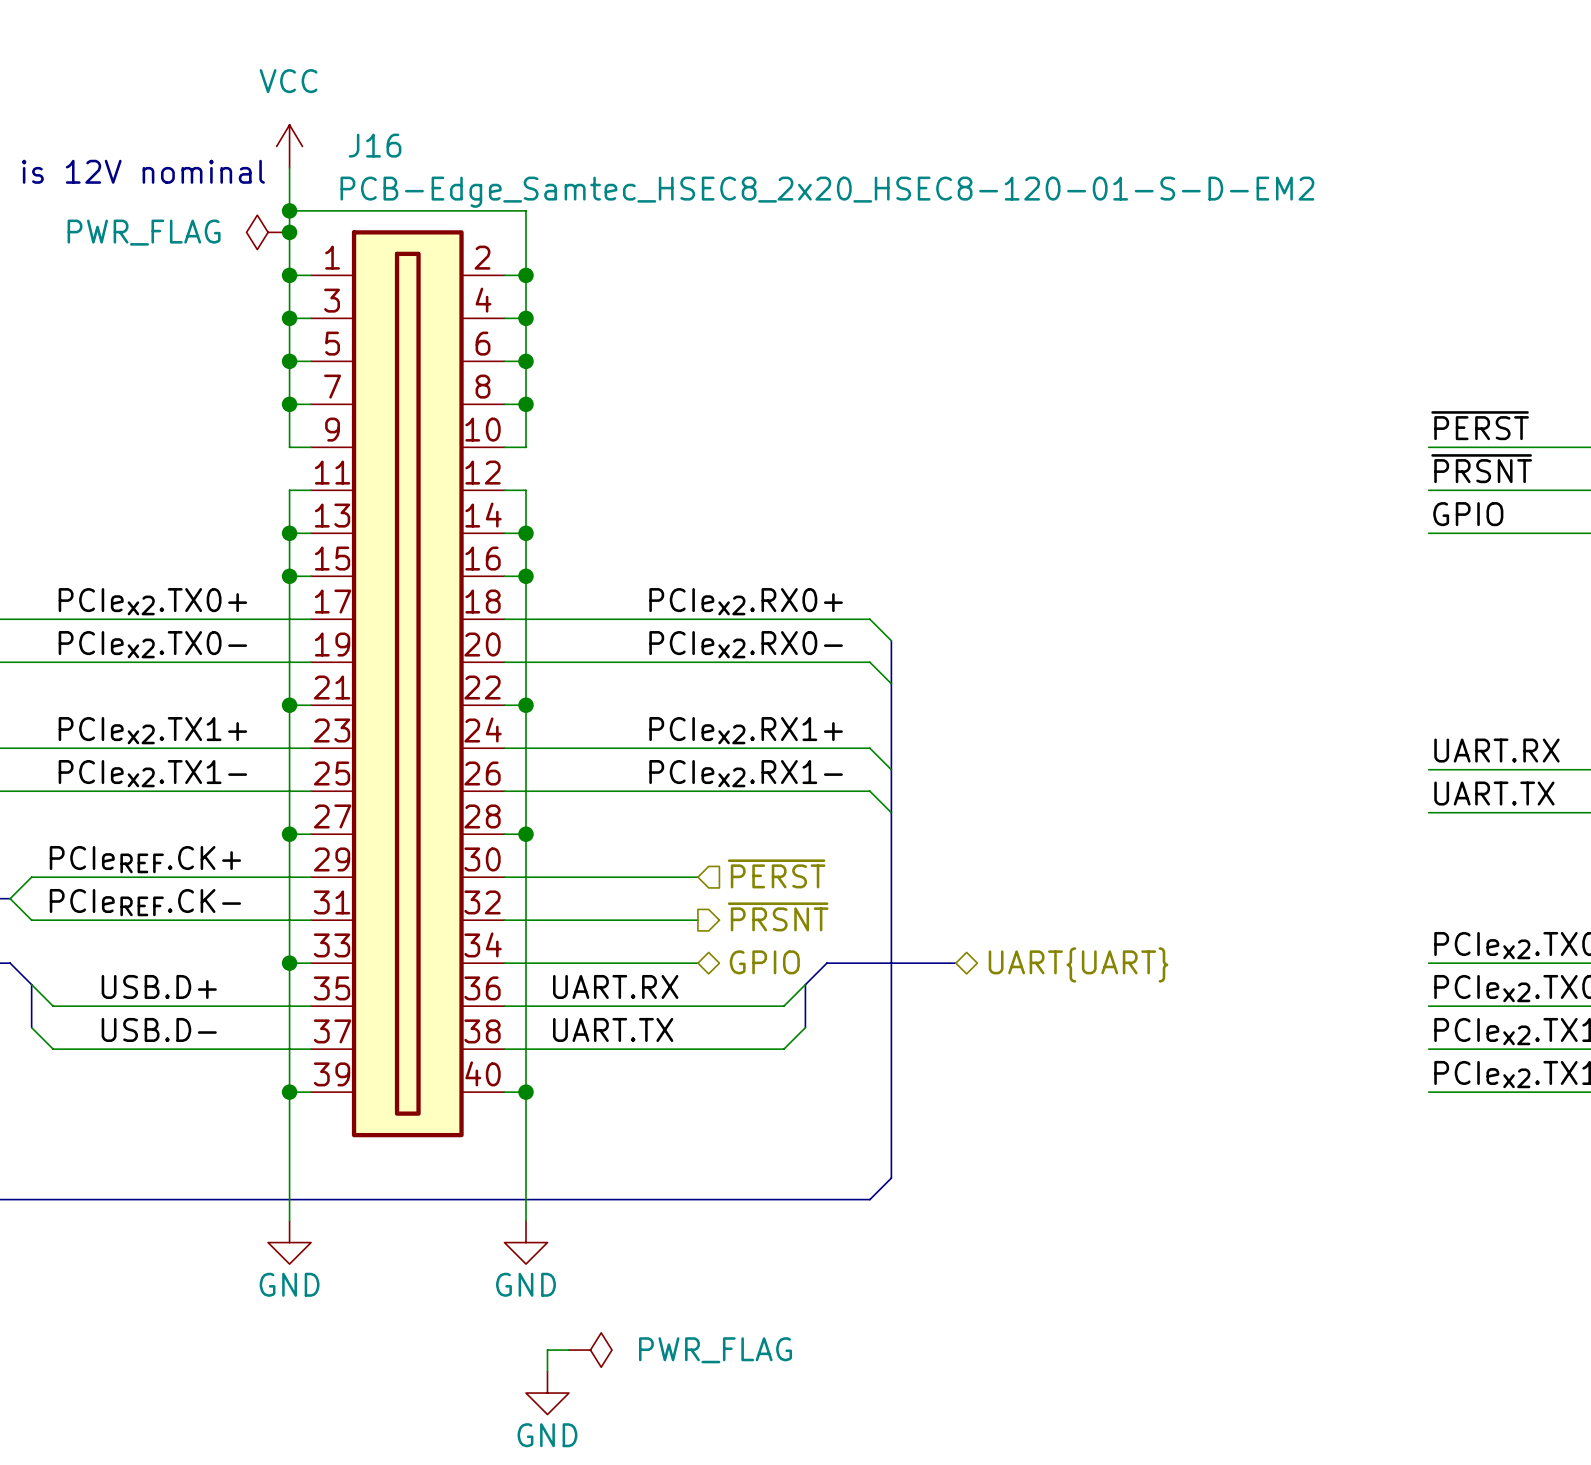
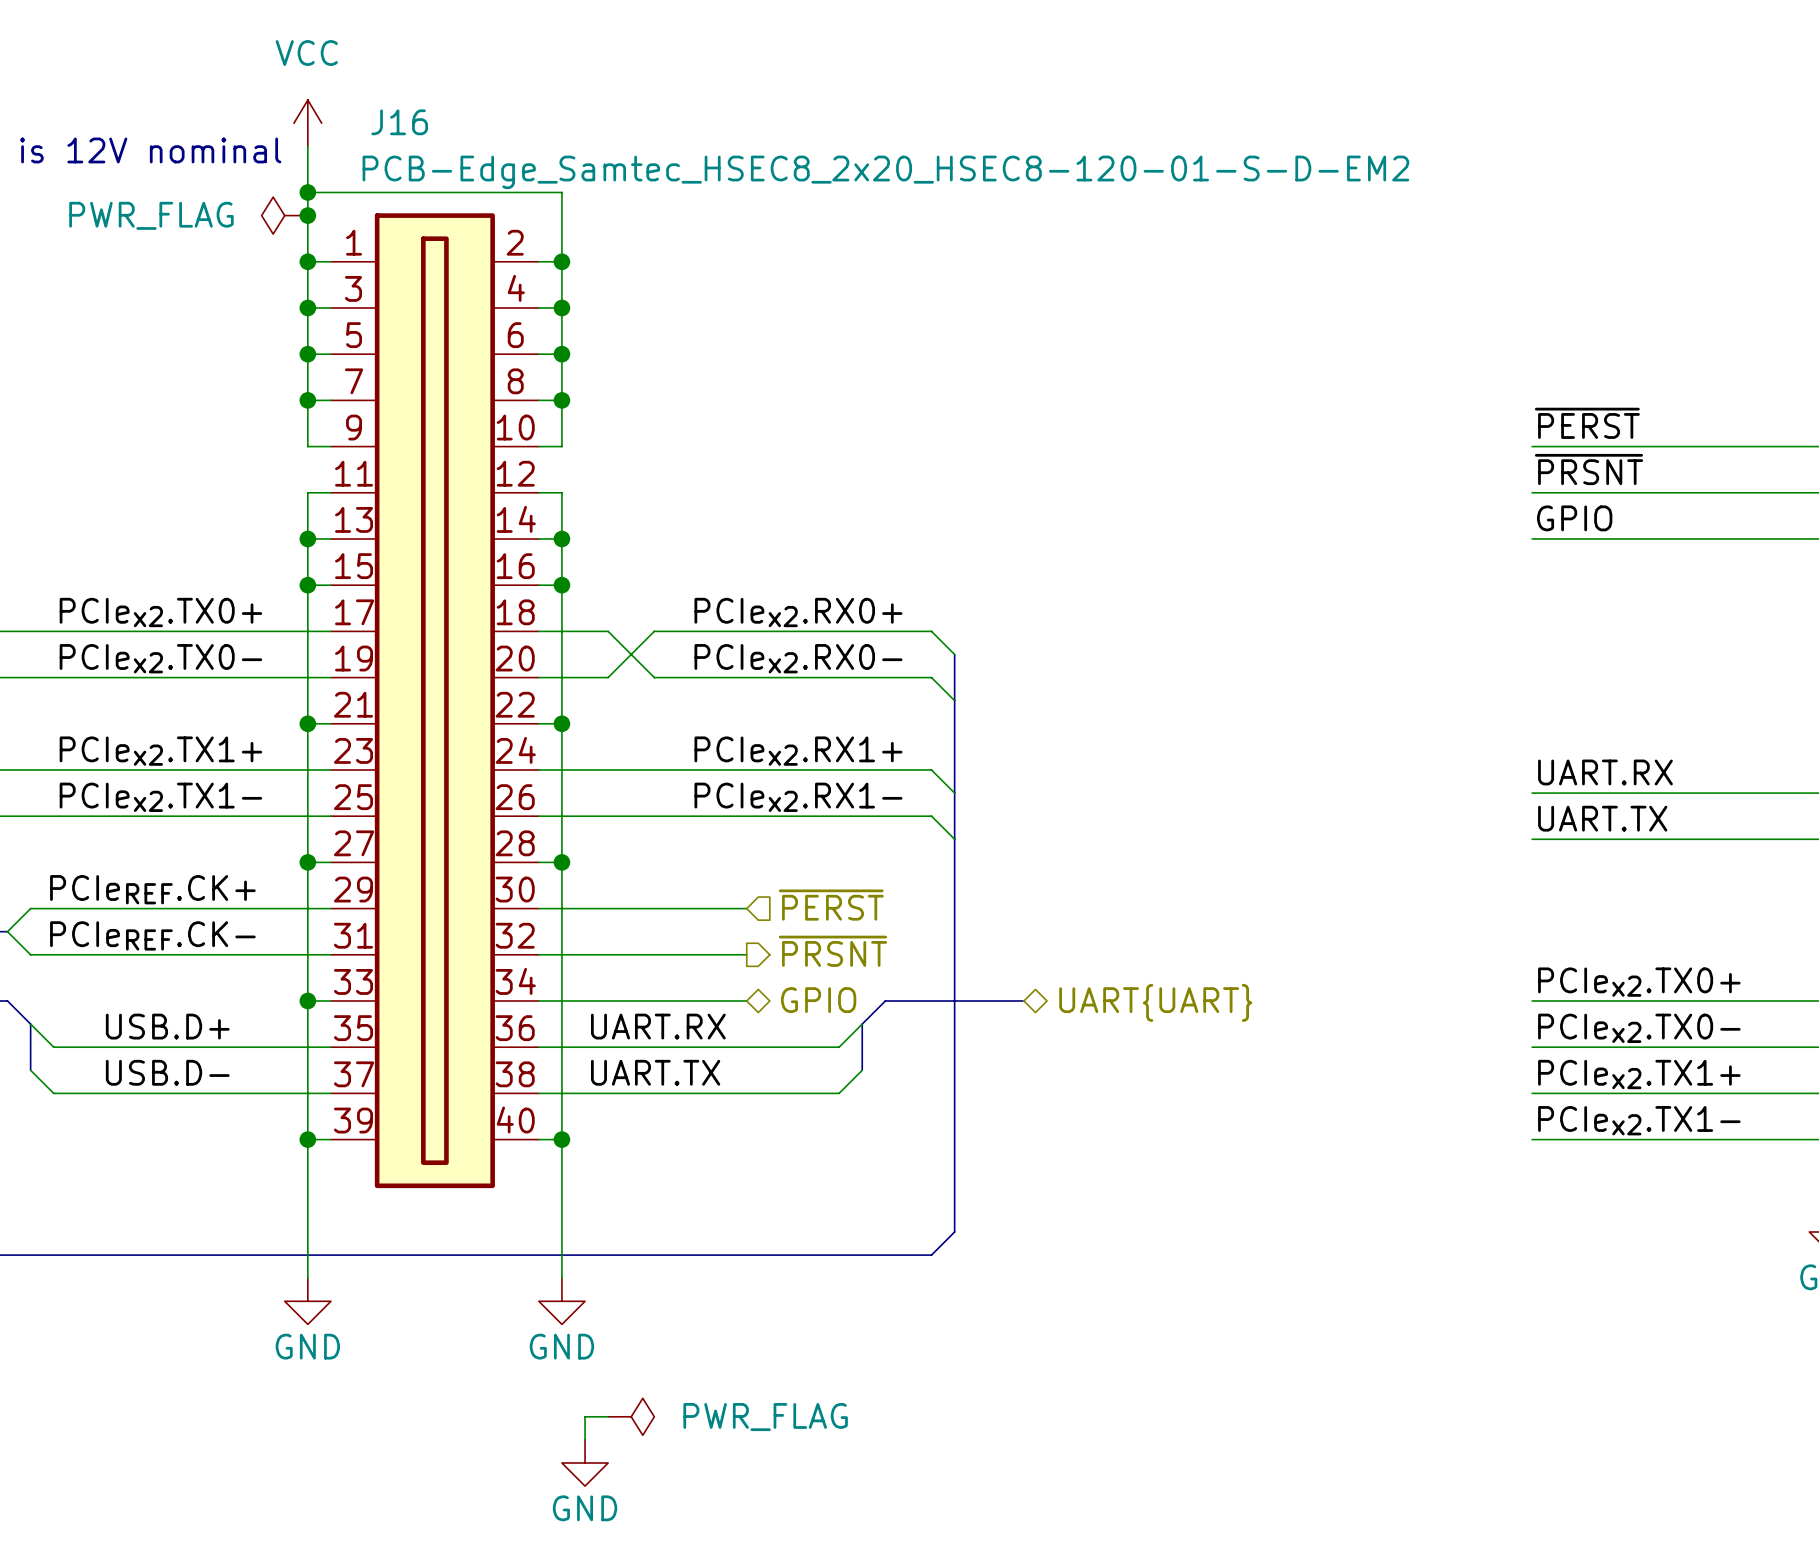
wire: (568, 619) (611, 619) -> (608, 631) (654, 677)
wire: (568, 662) (611, 662) -> (608, 677) (654, 631)

